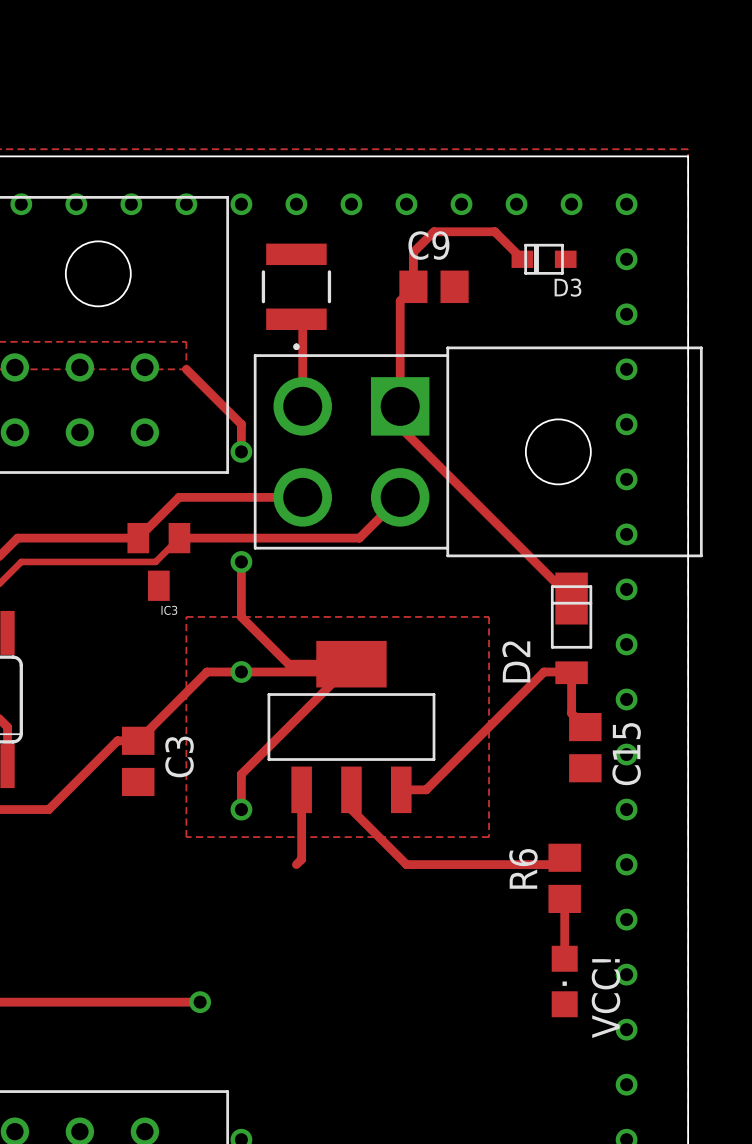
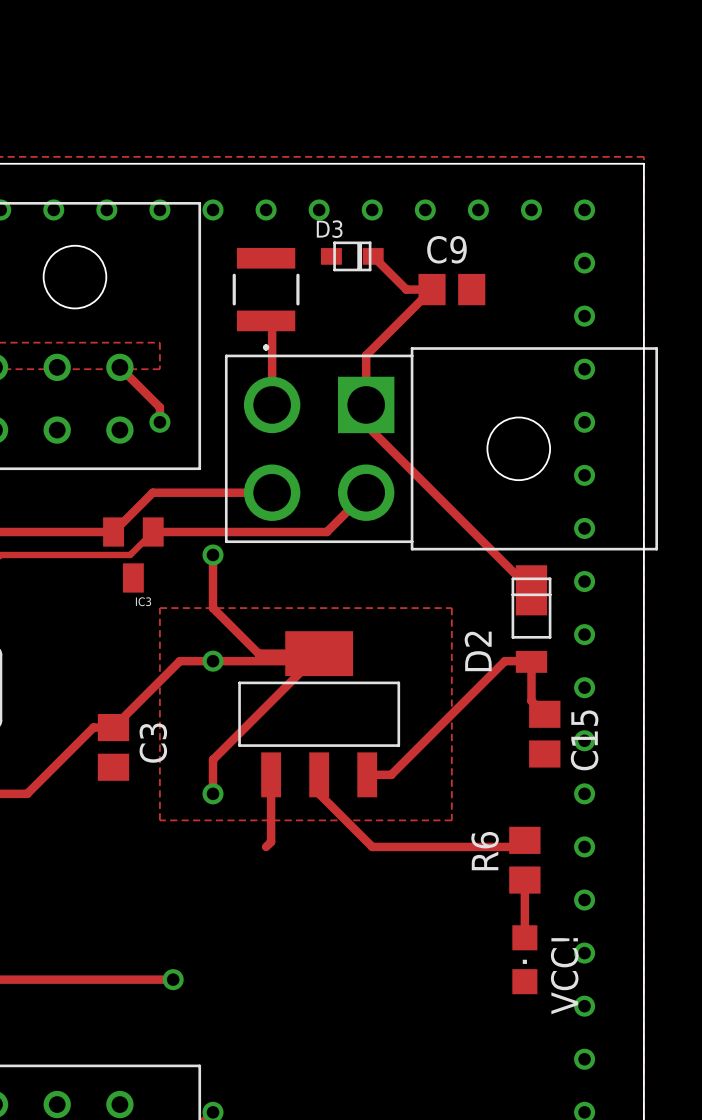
track: (522, 259) (494, 231) (434, 231) (413, 252) (413, 286) (400, 301) (400, 355) -> (373, 256) (406, 289) (432, 289) (366, 355)
D3 rotation: 0° (544, 259) -> 180° (352, 256)
D3 position: (544, 259) -> (352, 256)
C9 position: (434, 286) -> (451, 289)
track: none -> (119, 367) (159, 407) (159, 422)
track: (186, 369) (241, 424) (241, 451) -> none
via position: (241, 451) -> (159, 422)

